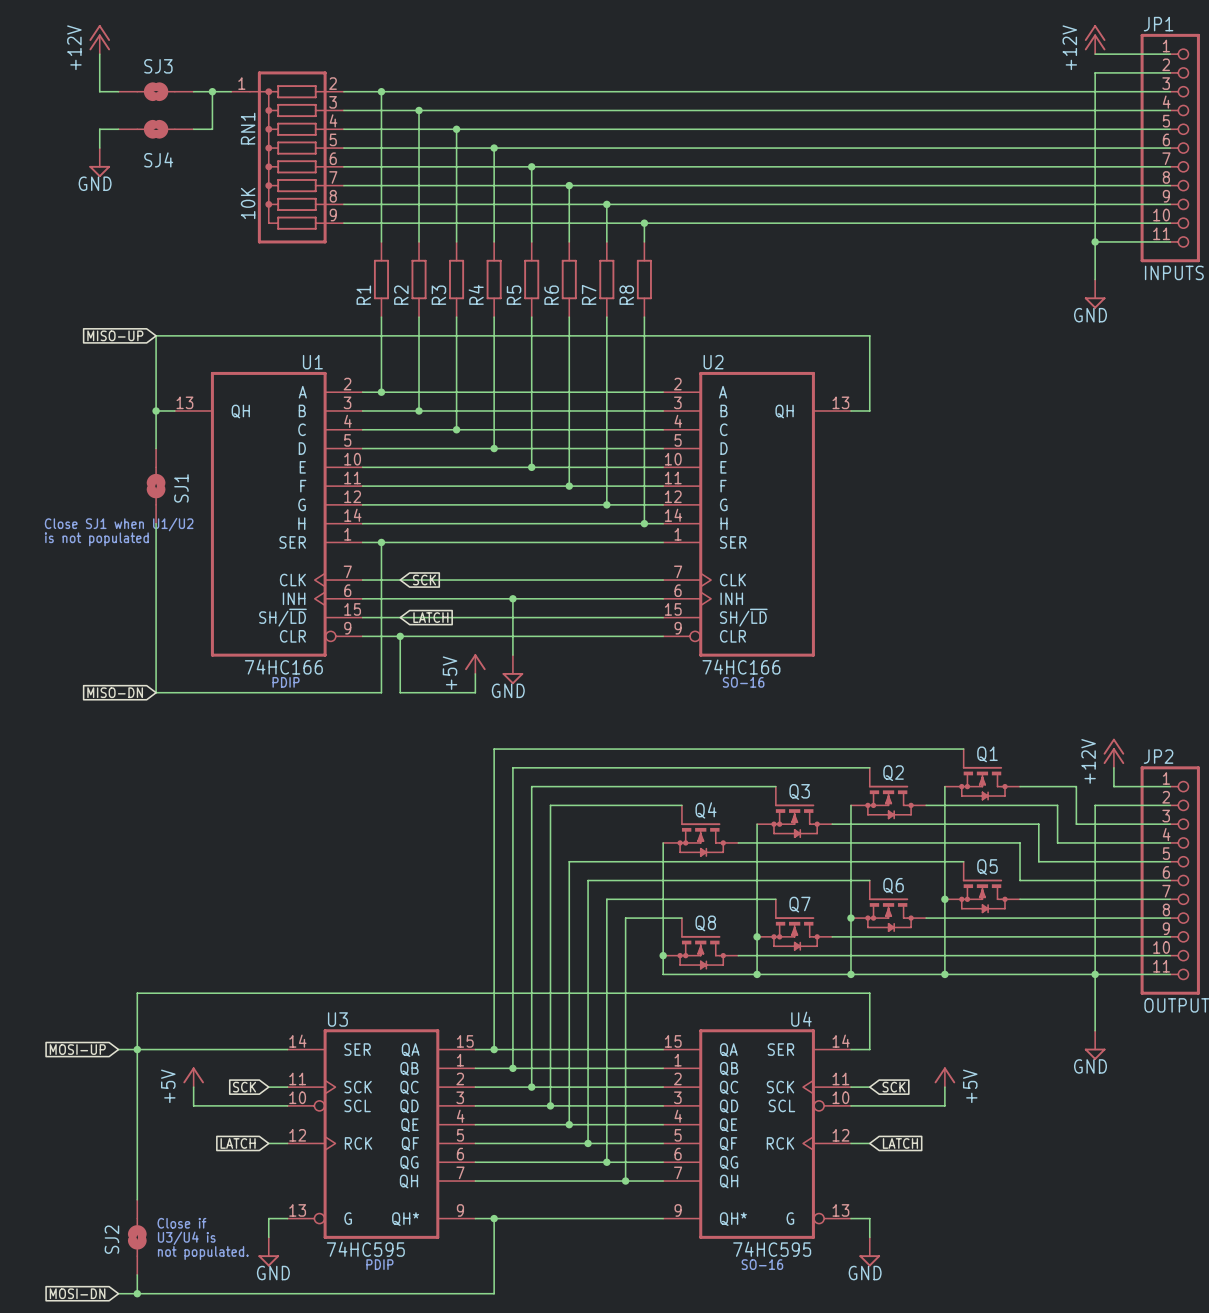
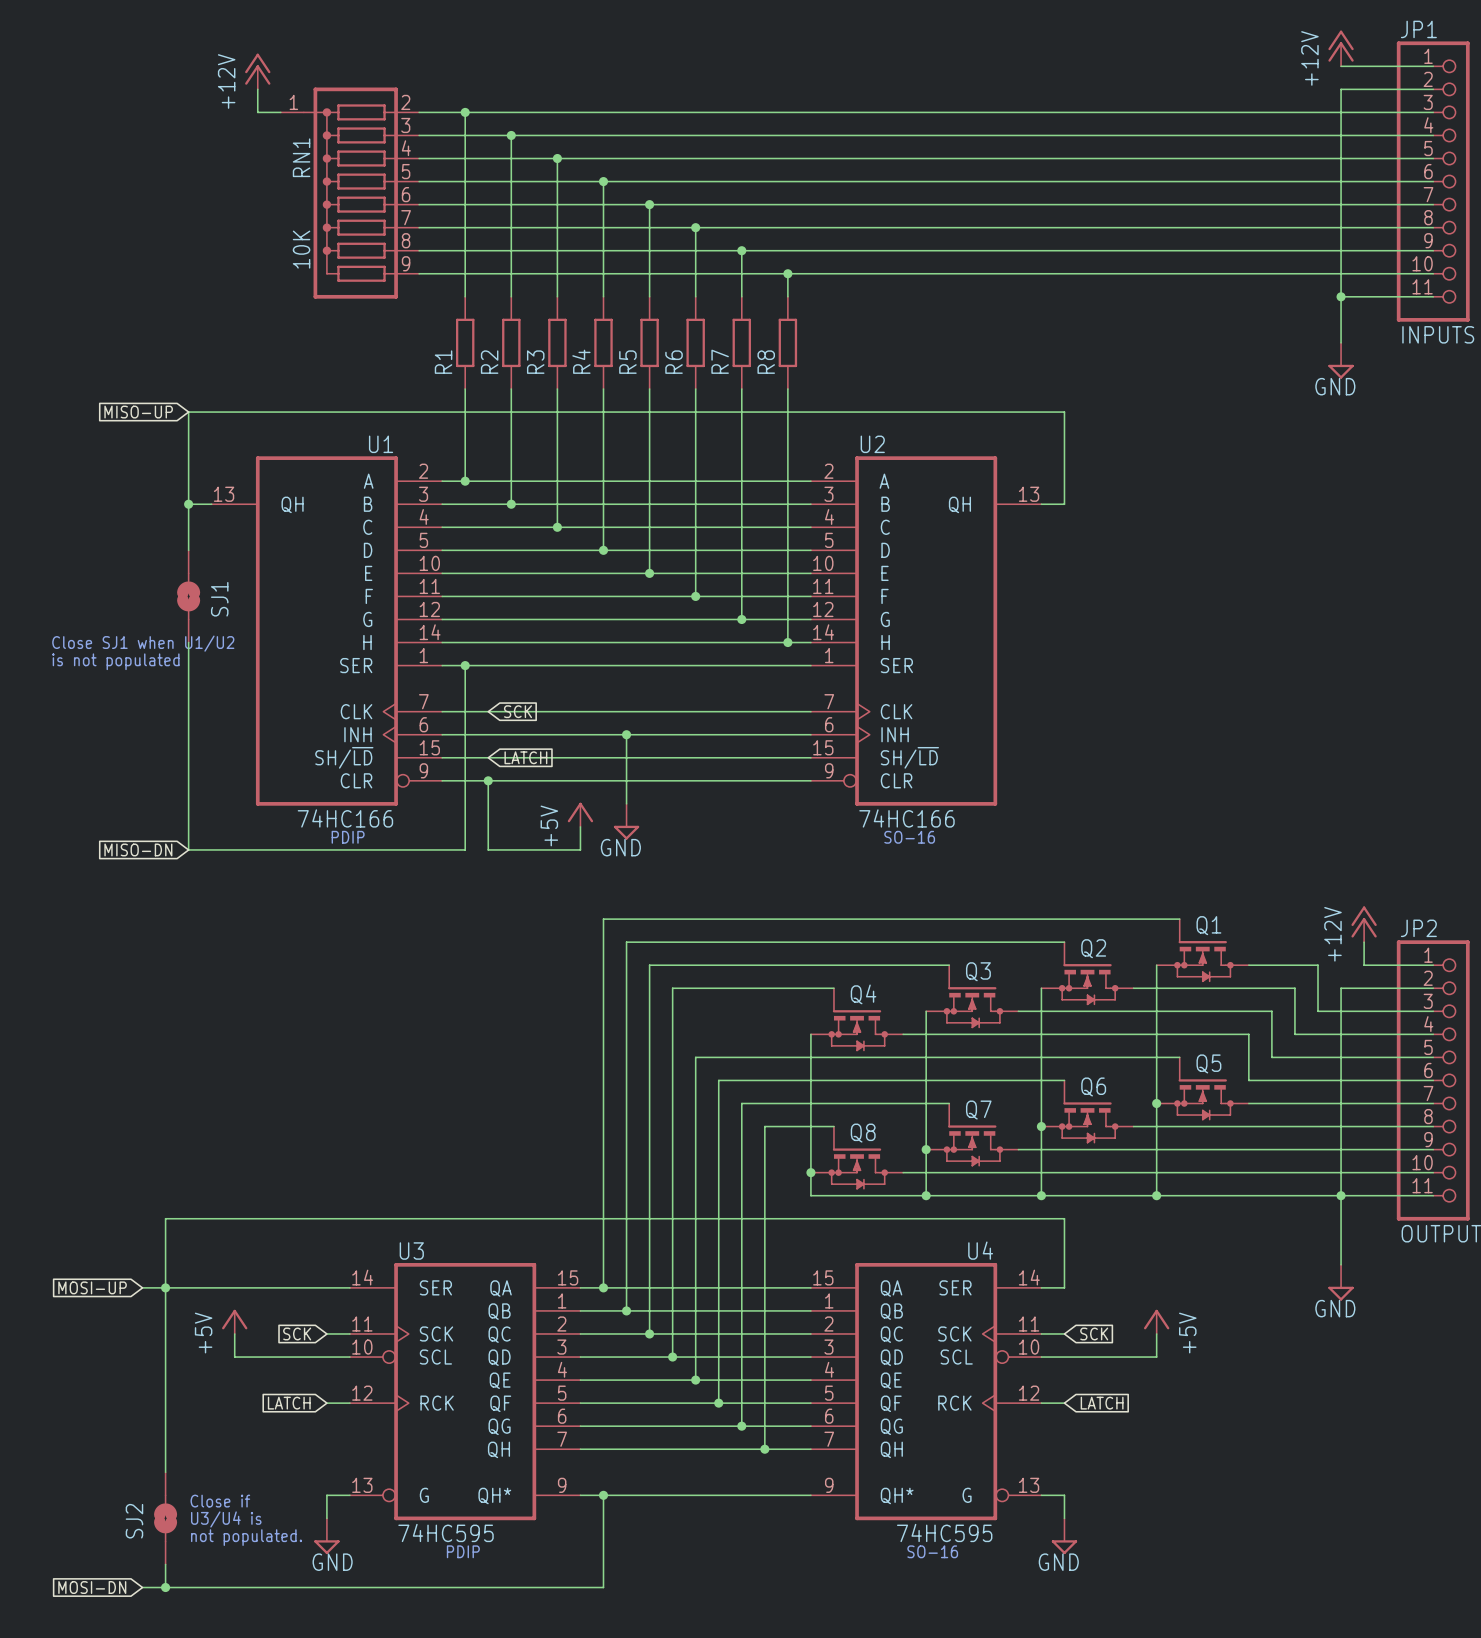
power symbol position: +12V (99, 39) -> +12V (257, 71)
wire: (99, 54) (99, 91) (118, 91) -> none
wire: none -> (257, 89) (257, 112)
SJ3: (156, 91) -> none
wire: (193, 91) (212, 91) (212, 129) (193, 129) -> none
junction: (212, 91) -> none
wire: (118, 129) (99, 129) (99, 148) -> none
SJ4: (156, 129) -> none
power symbol: GND (99, 162) -> none

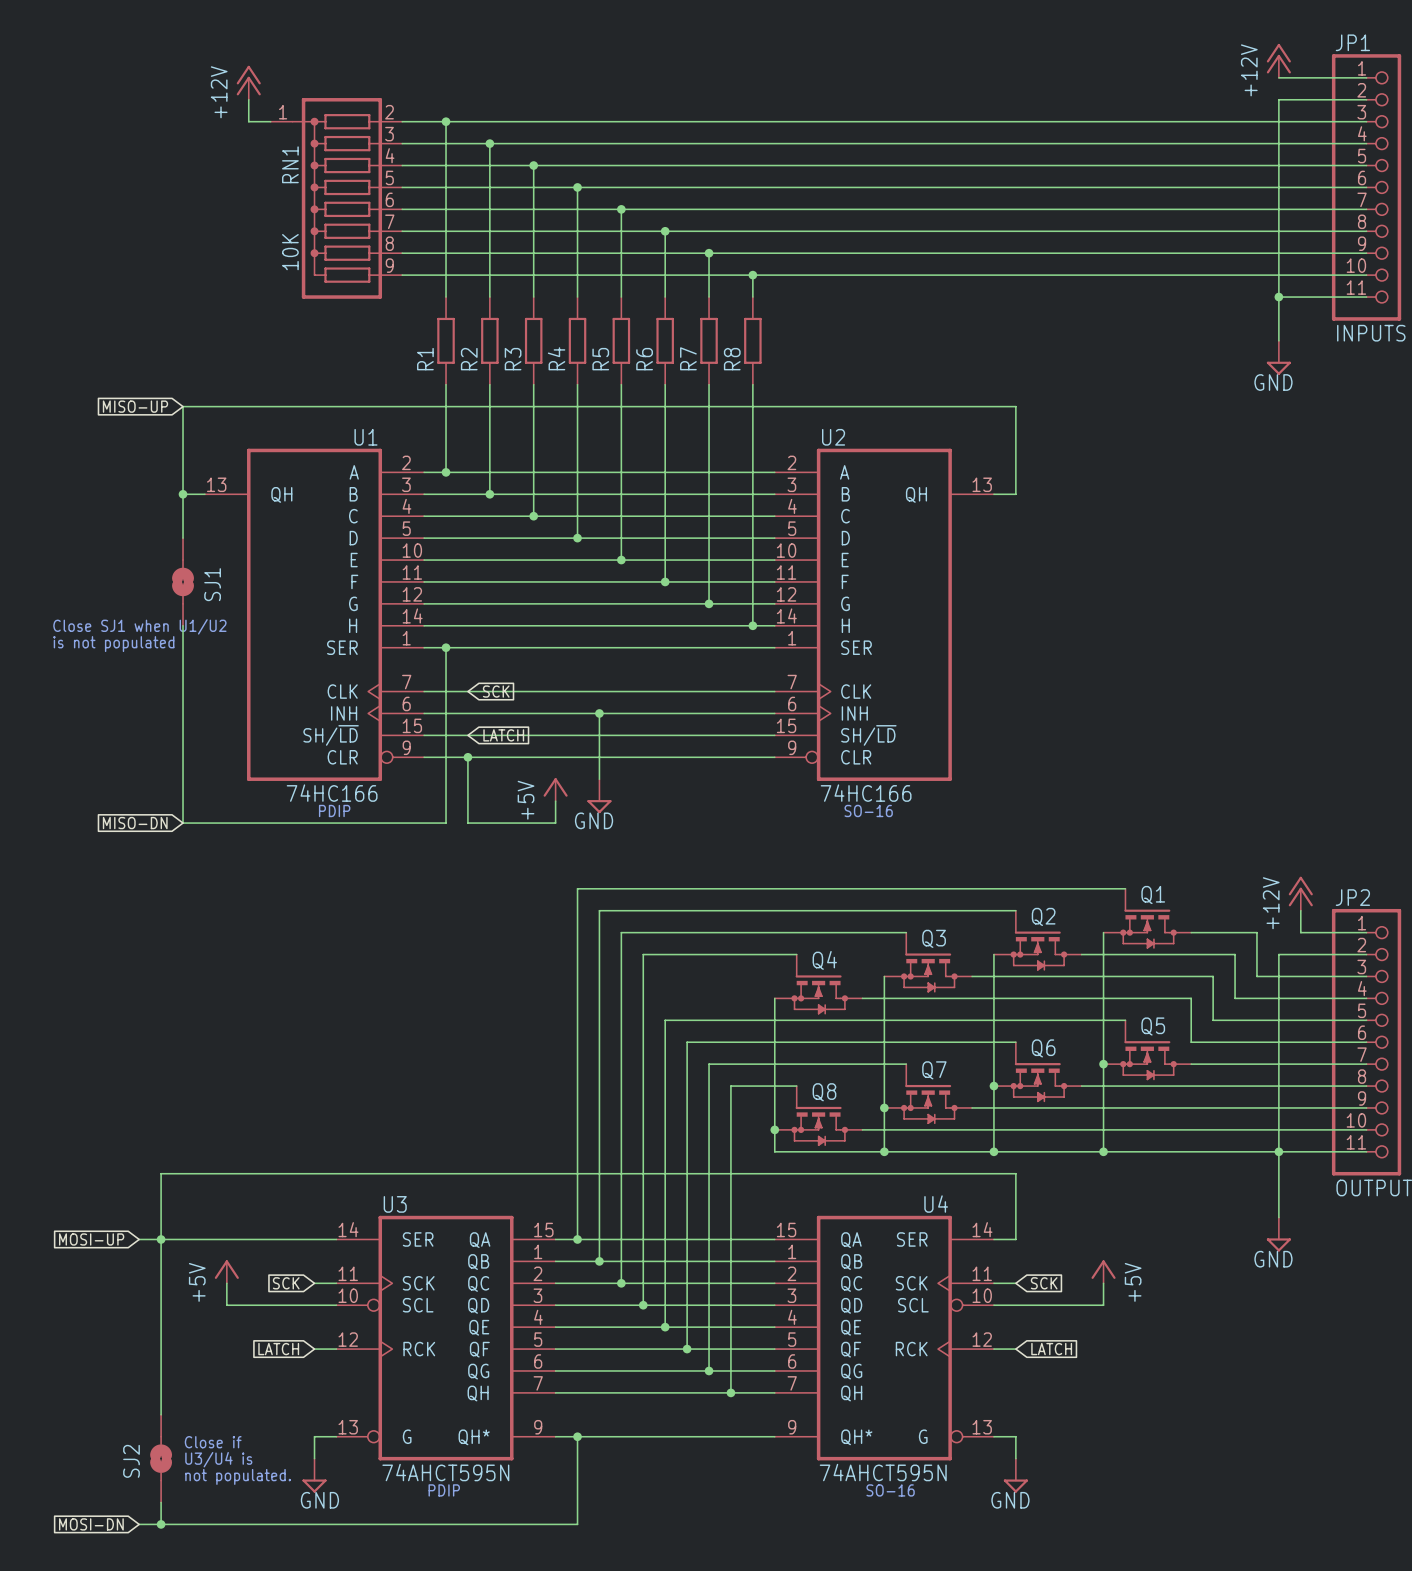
U3 value: 74HC595 (446, 1532) -> 74AHCT595N (445, 1472)
U4 value: 74HC595 (944, 1532) -> 74AHCT595N (883, 1472)

